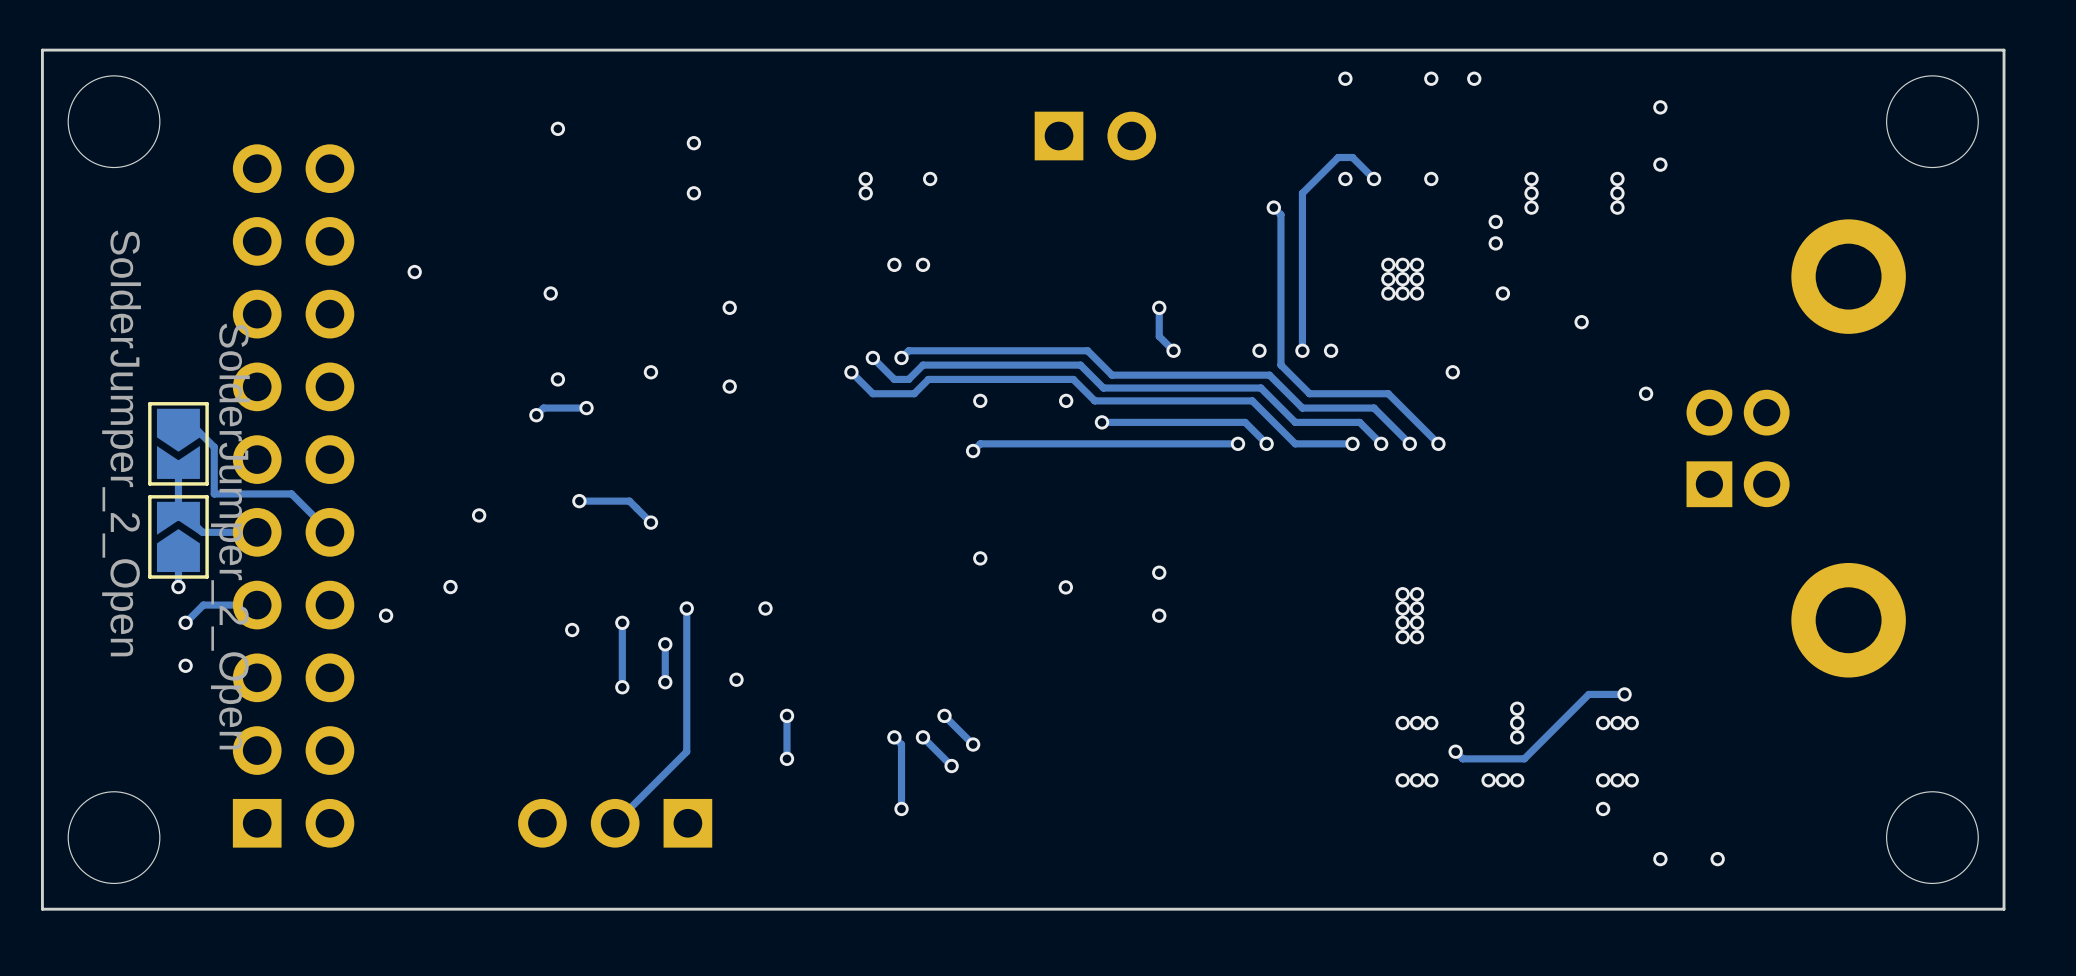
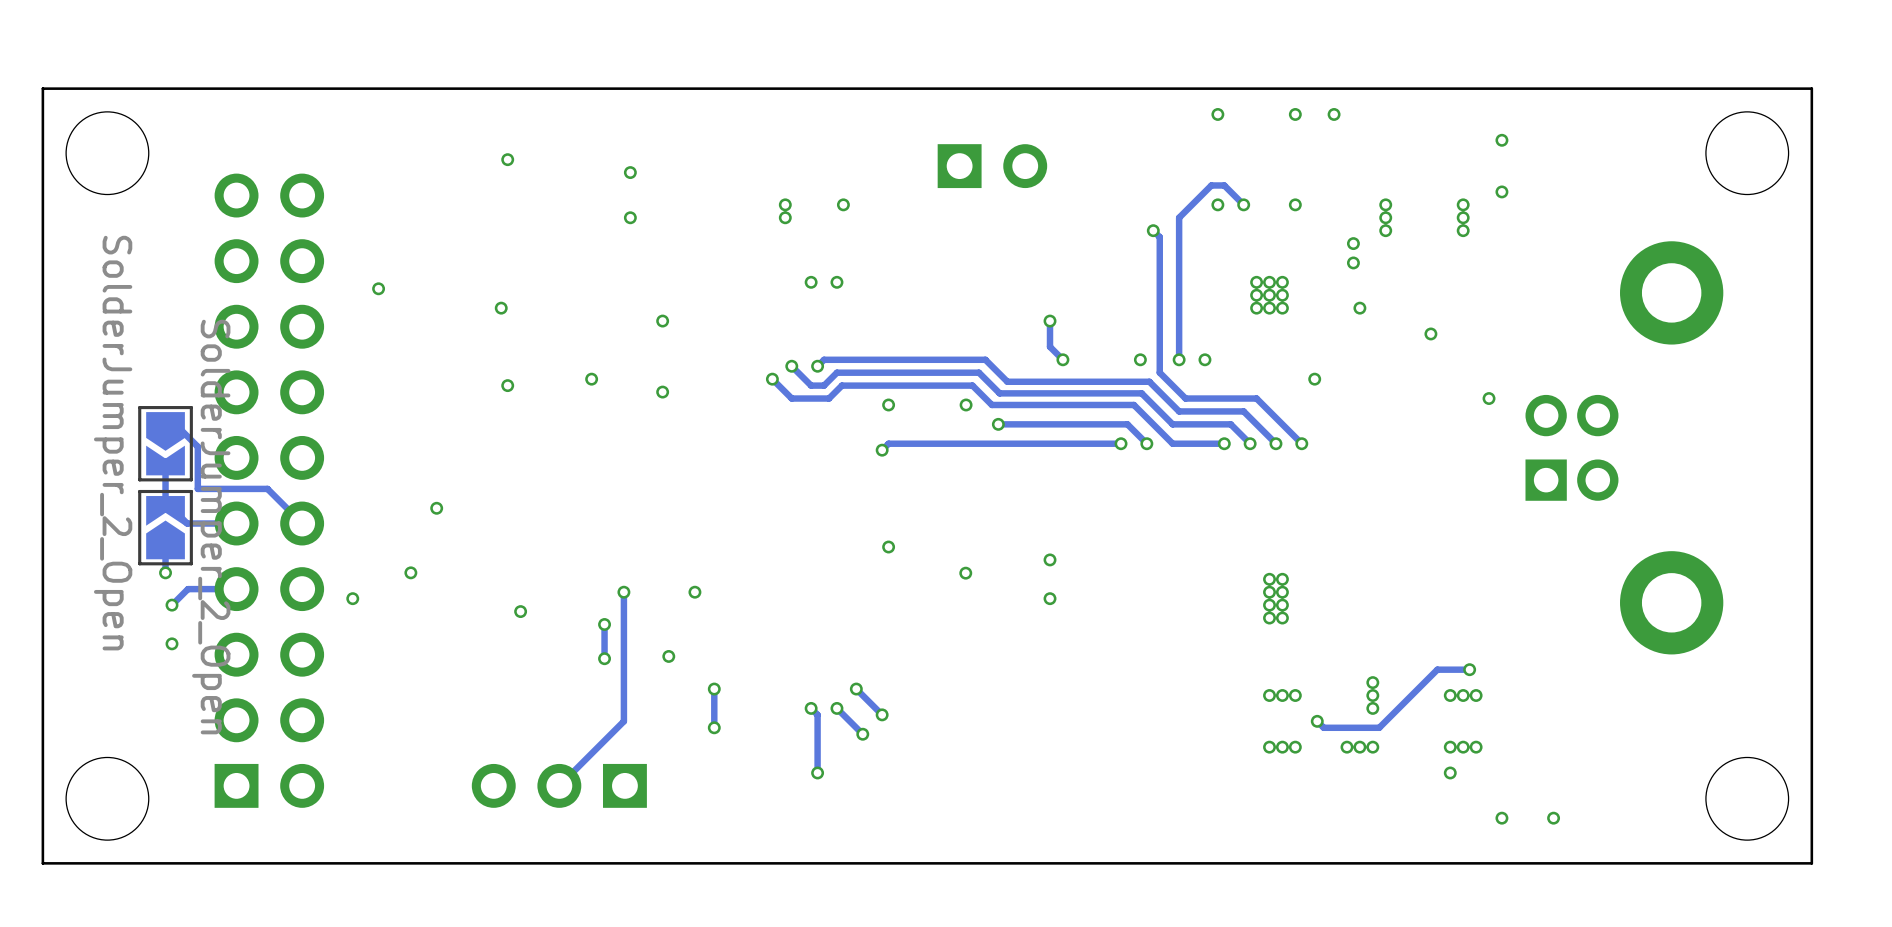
track: (586, 408) (543, 408) (536, 415) -> none
via: (586, 408) -> none
via: (536, 415) -> none
track: (579, 501) (629, 501) (650, 522) -> none
via: (579, 501) -> none
via: (650, 522) -> none
track: (622, 622) (622, 687) -> none
via: (622, 622) -> none
via: (622, 687) -> none

